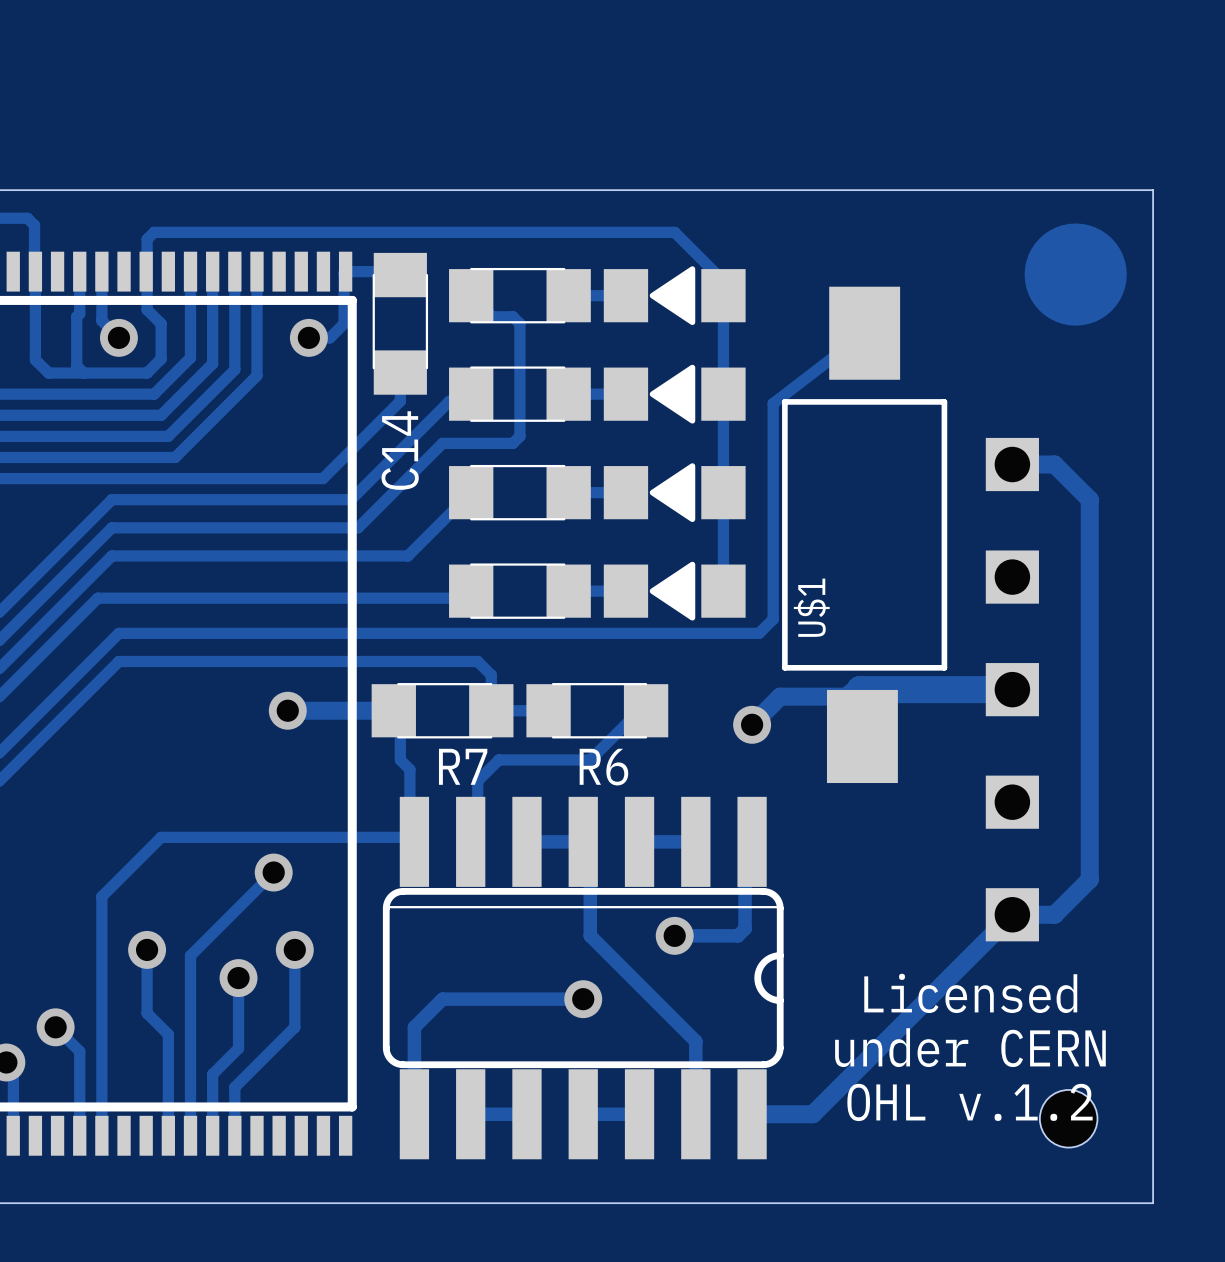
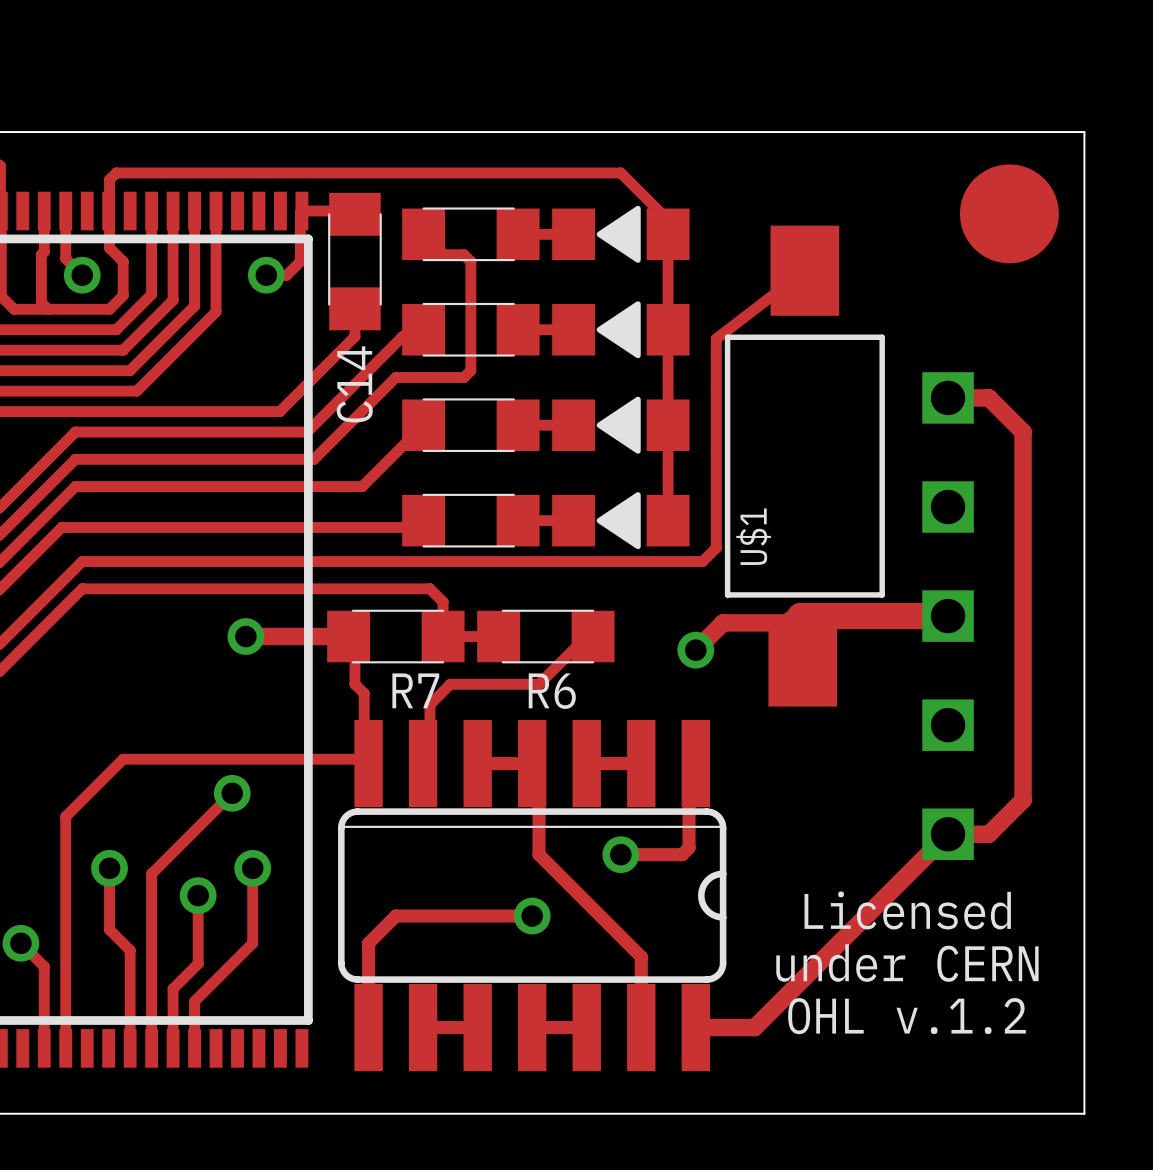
hole: (1068, 1118) -> none

